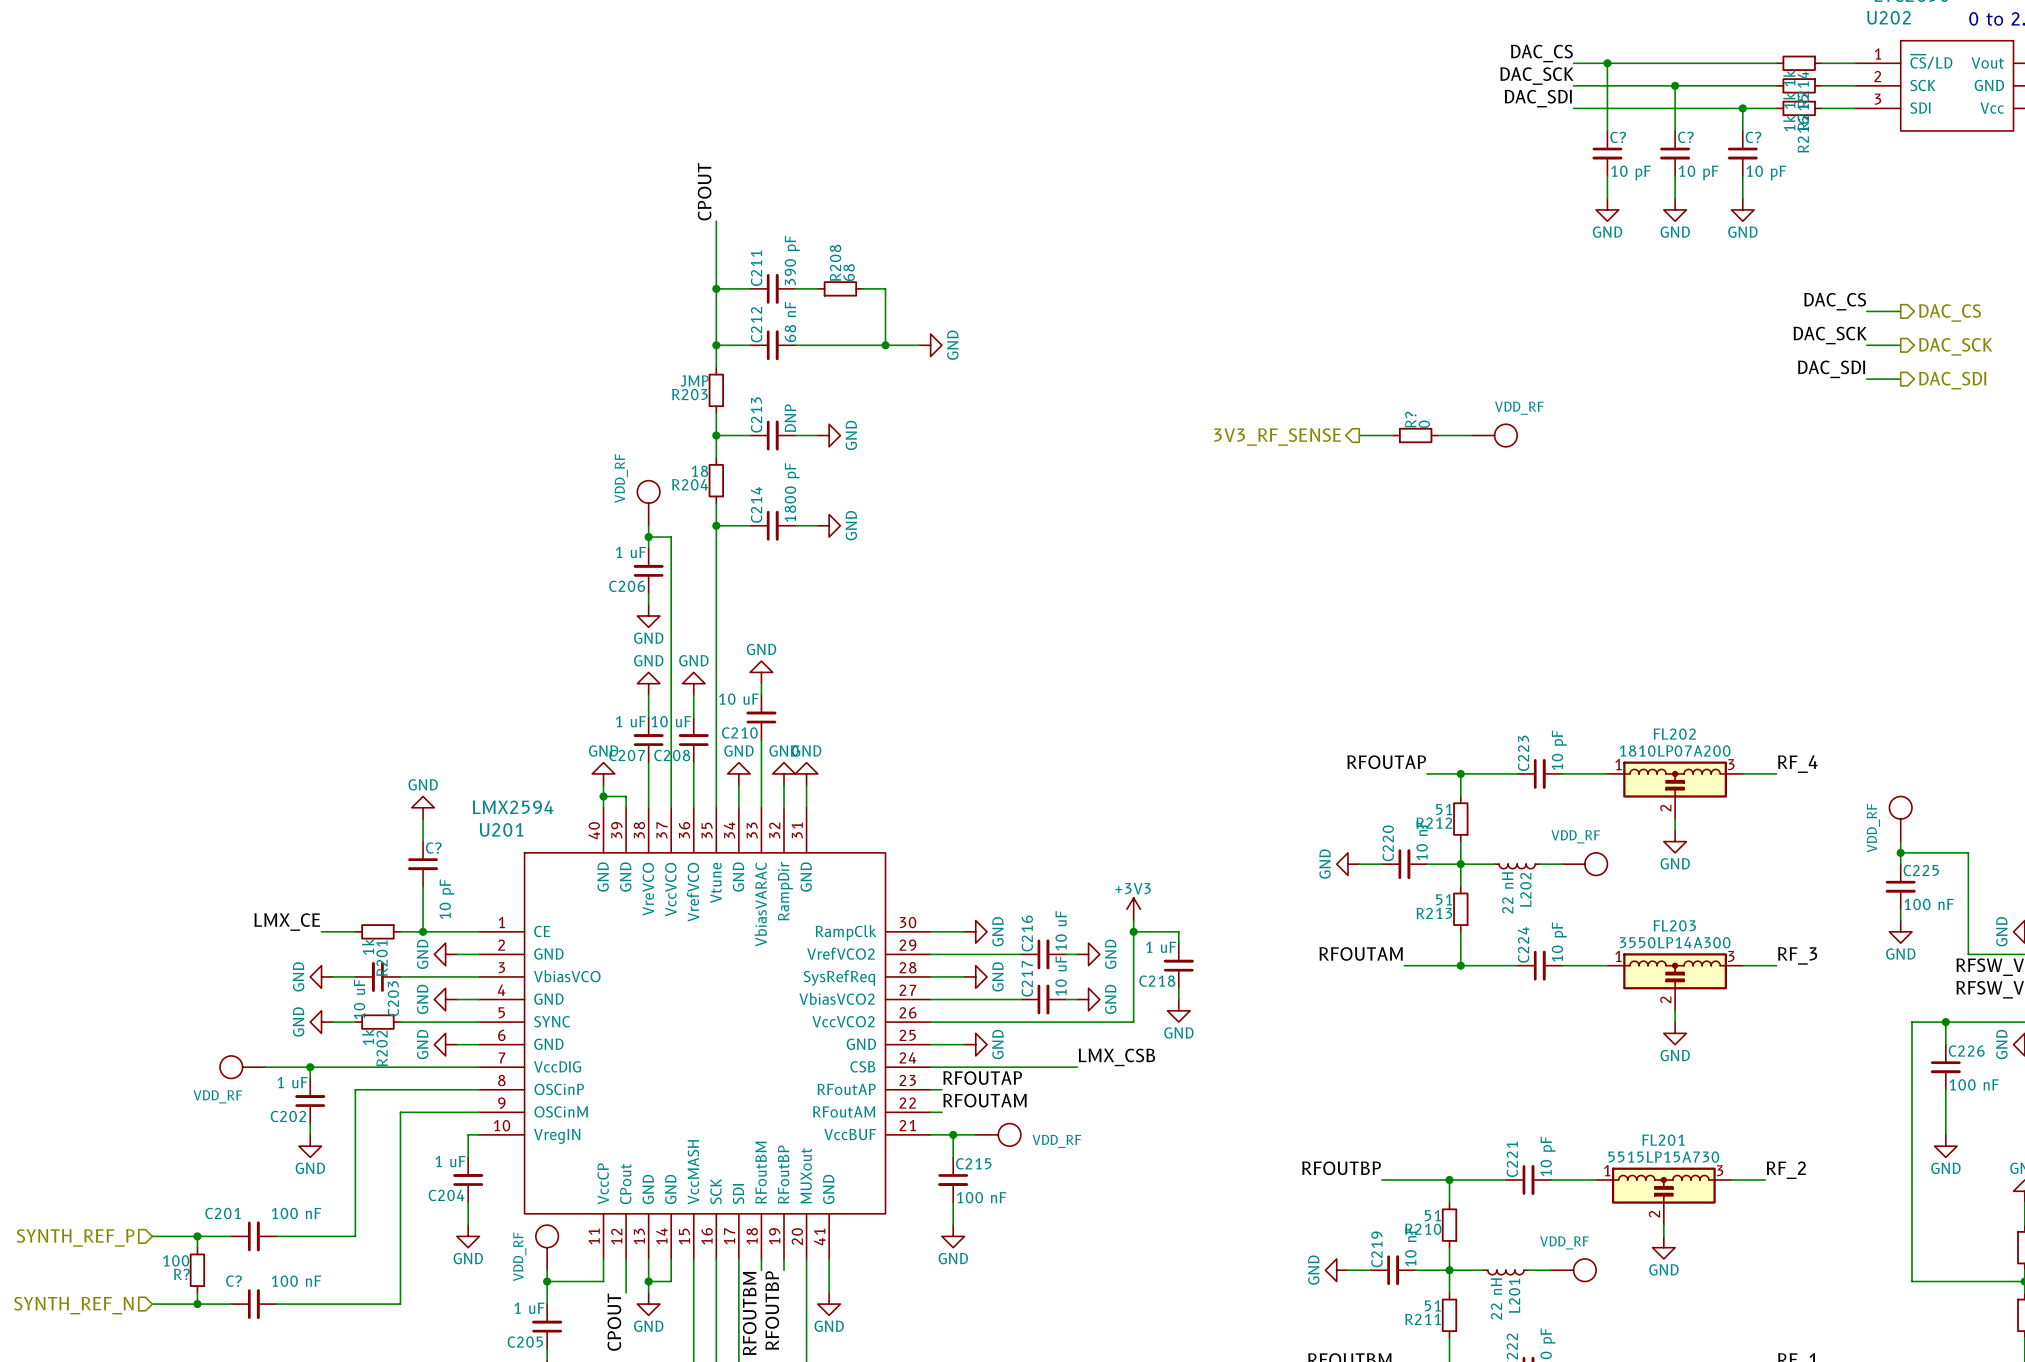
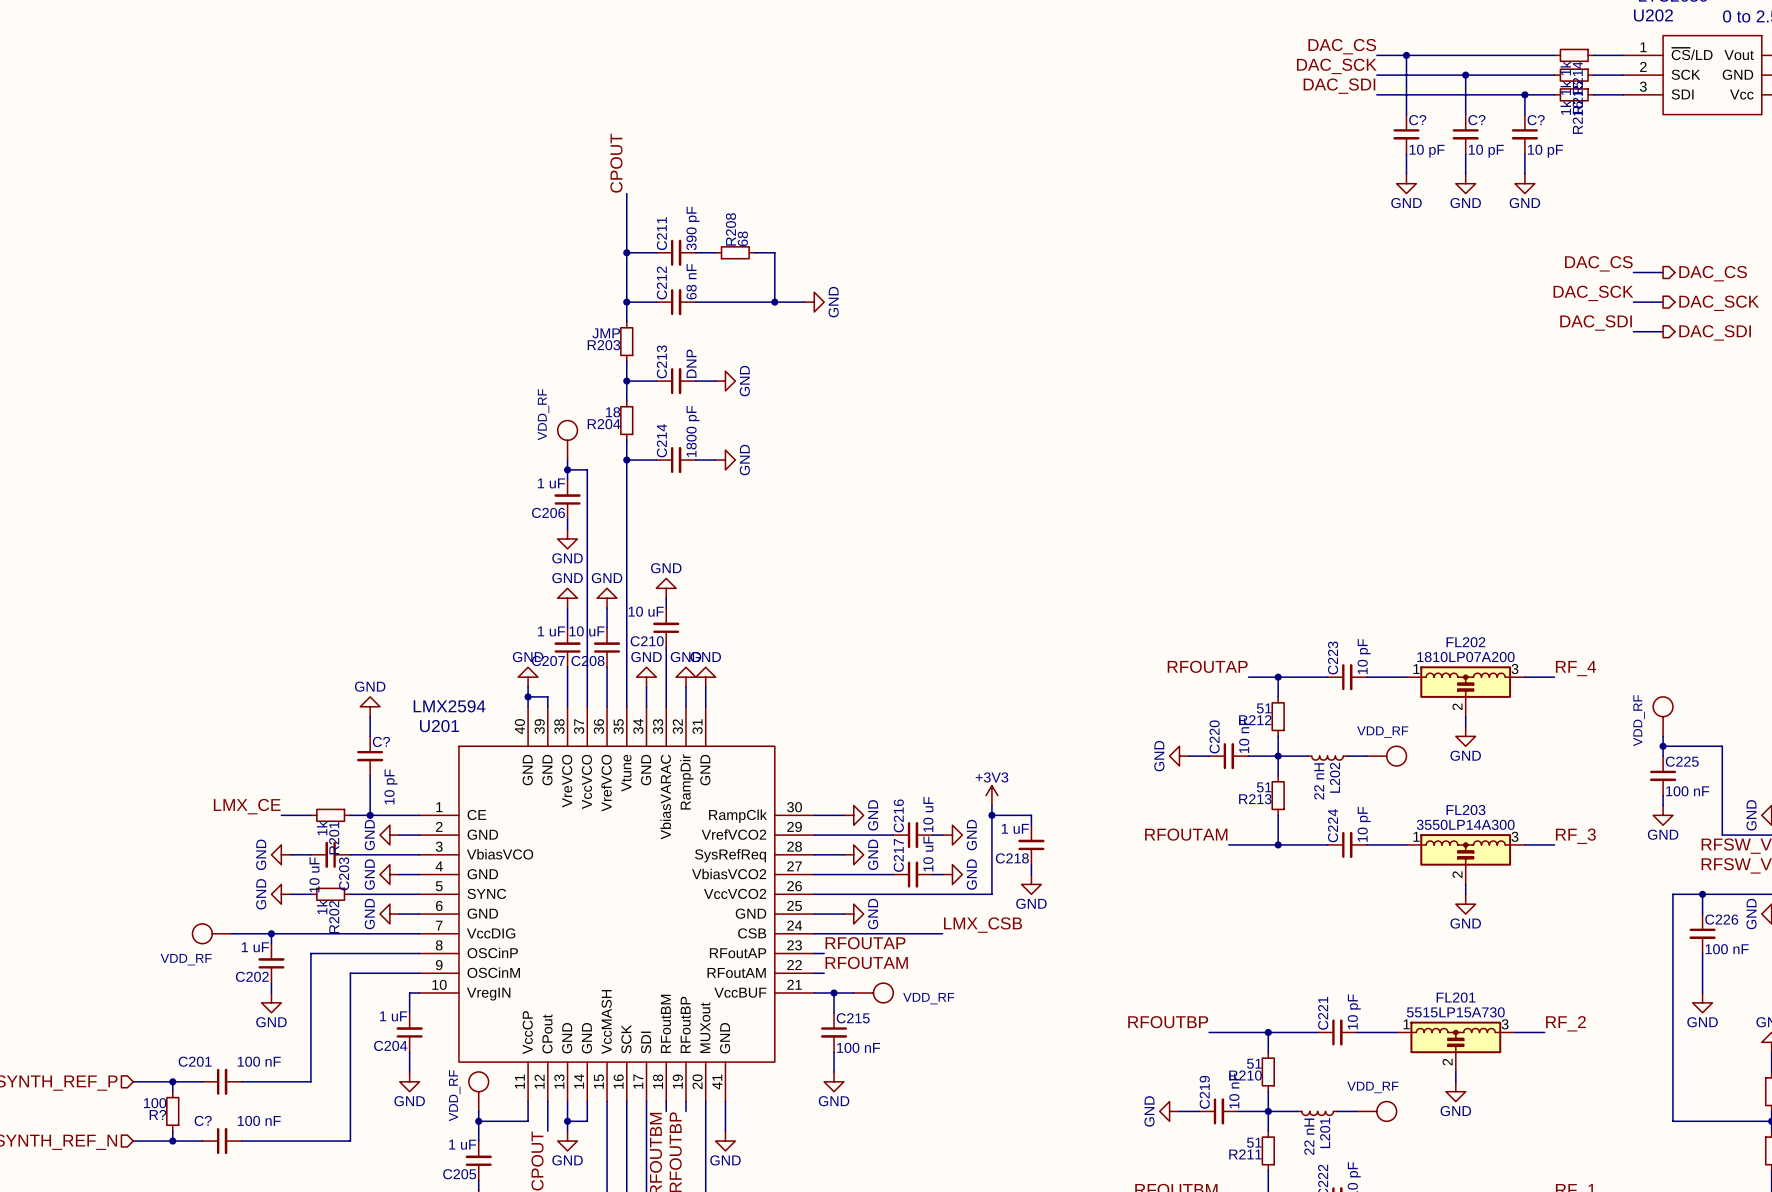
wire: (1359, 435) (1393, 435) -> none
R?: 0 (1415, 435) -> none
wire: (1438, 435) (1472, 435) -> none
power symbol: VDD_RF (1494, 435) -> none
hierarchical label: 3V3_RF_SENSE (1277, 437) -> none

